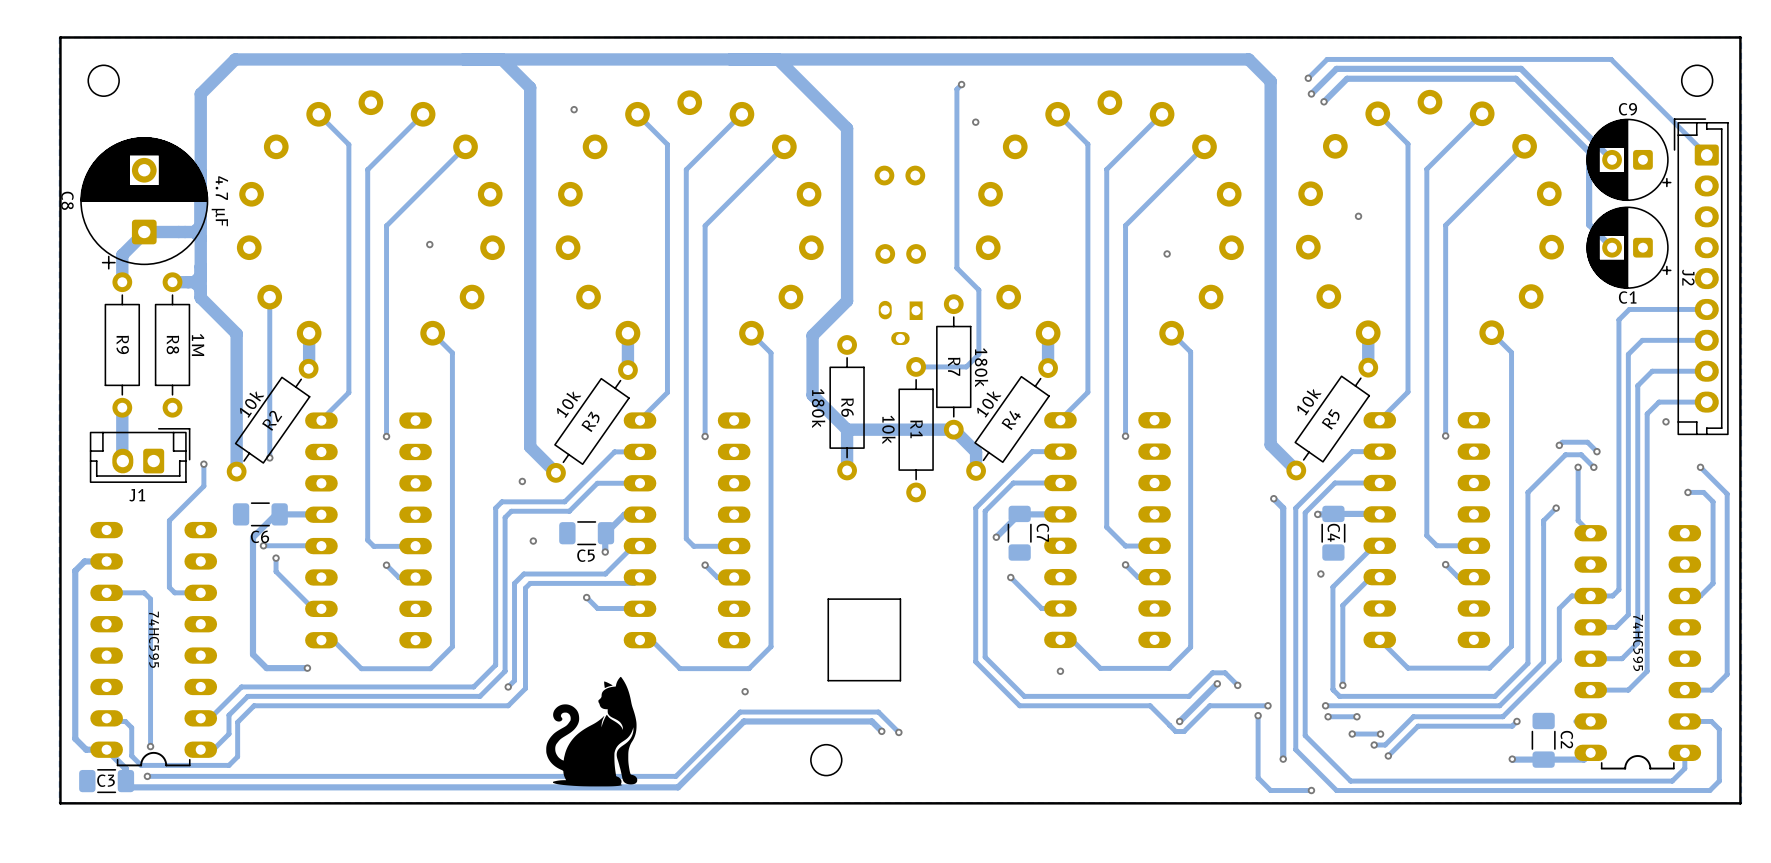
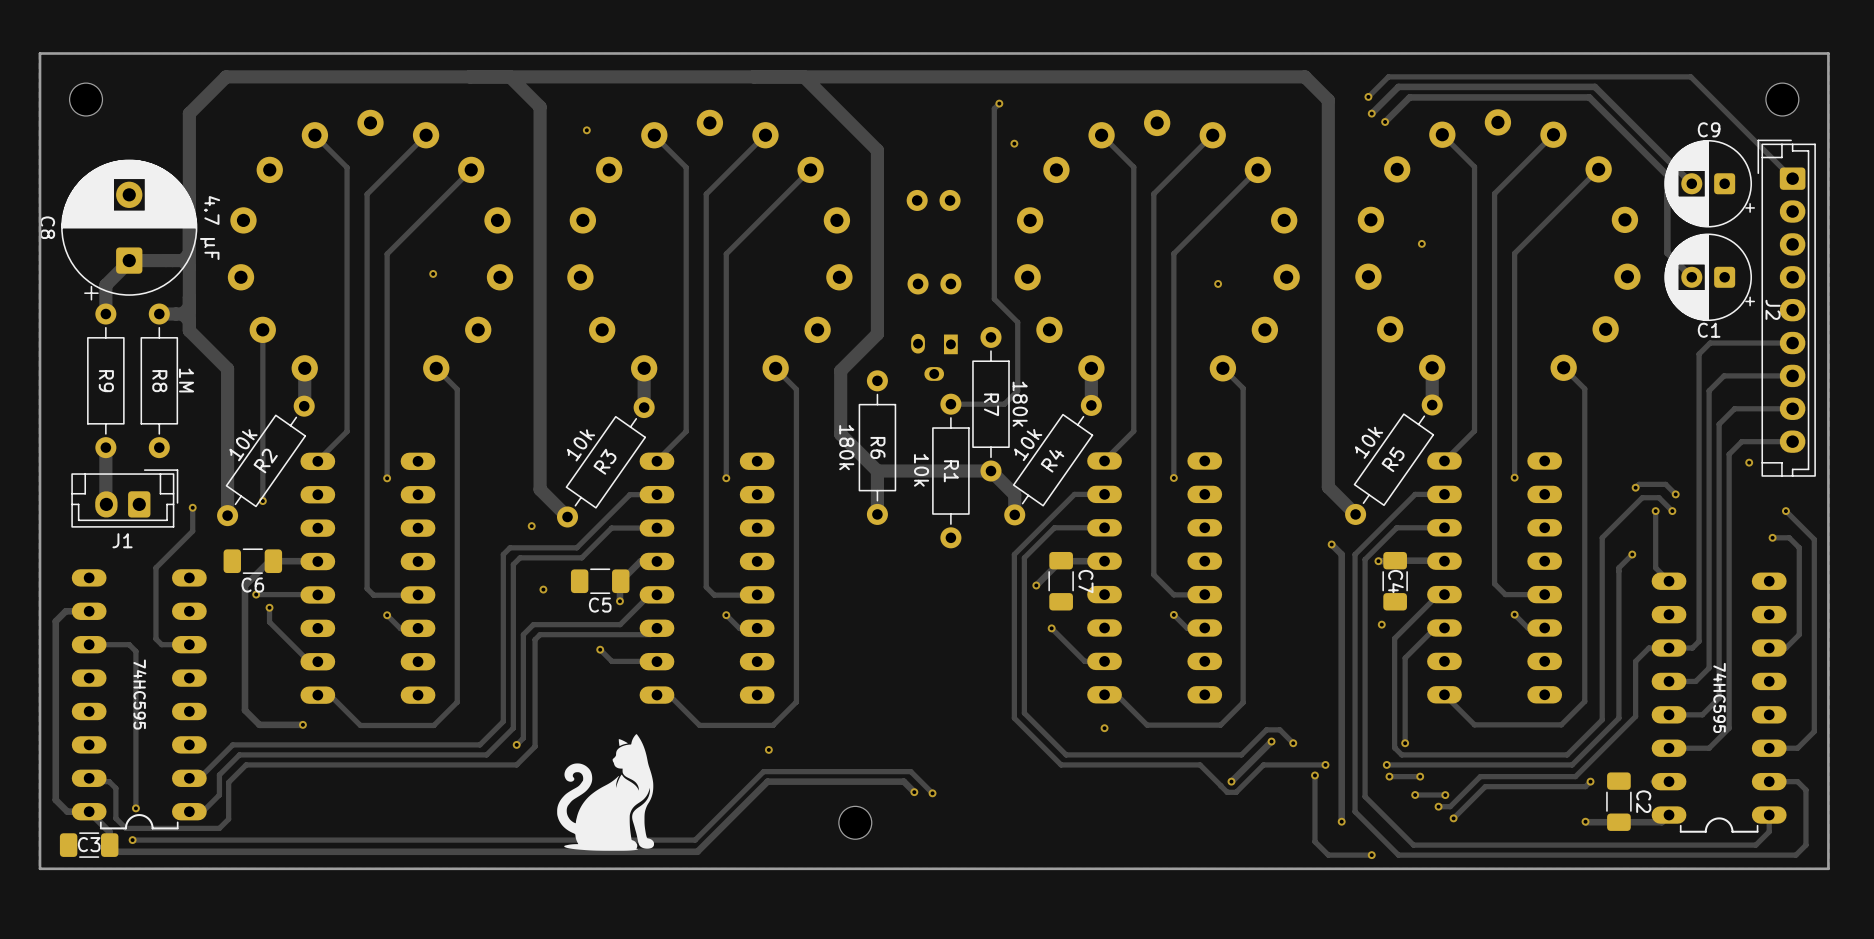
board edge: (900, 599) (828, 599) (828, 680) (900, 680) (900, 599) -> none

